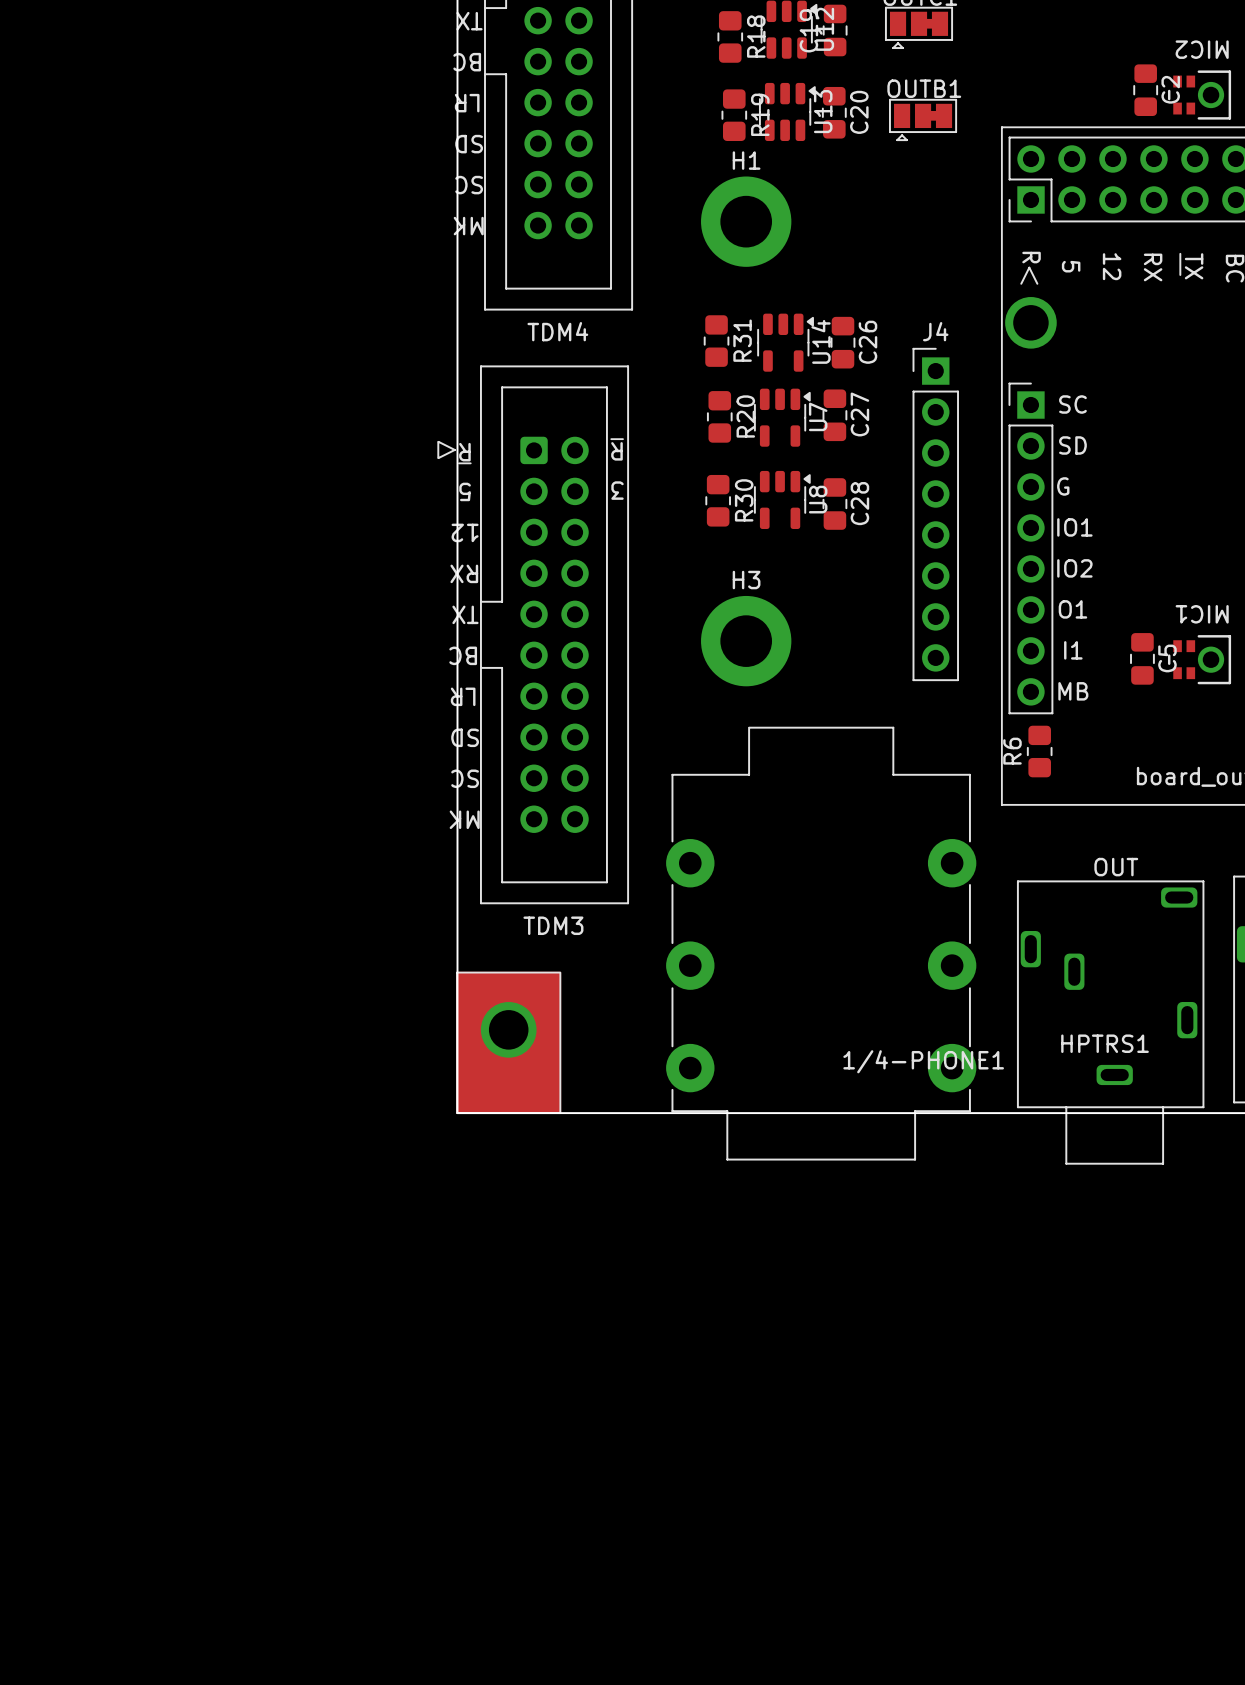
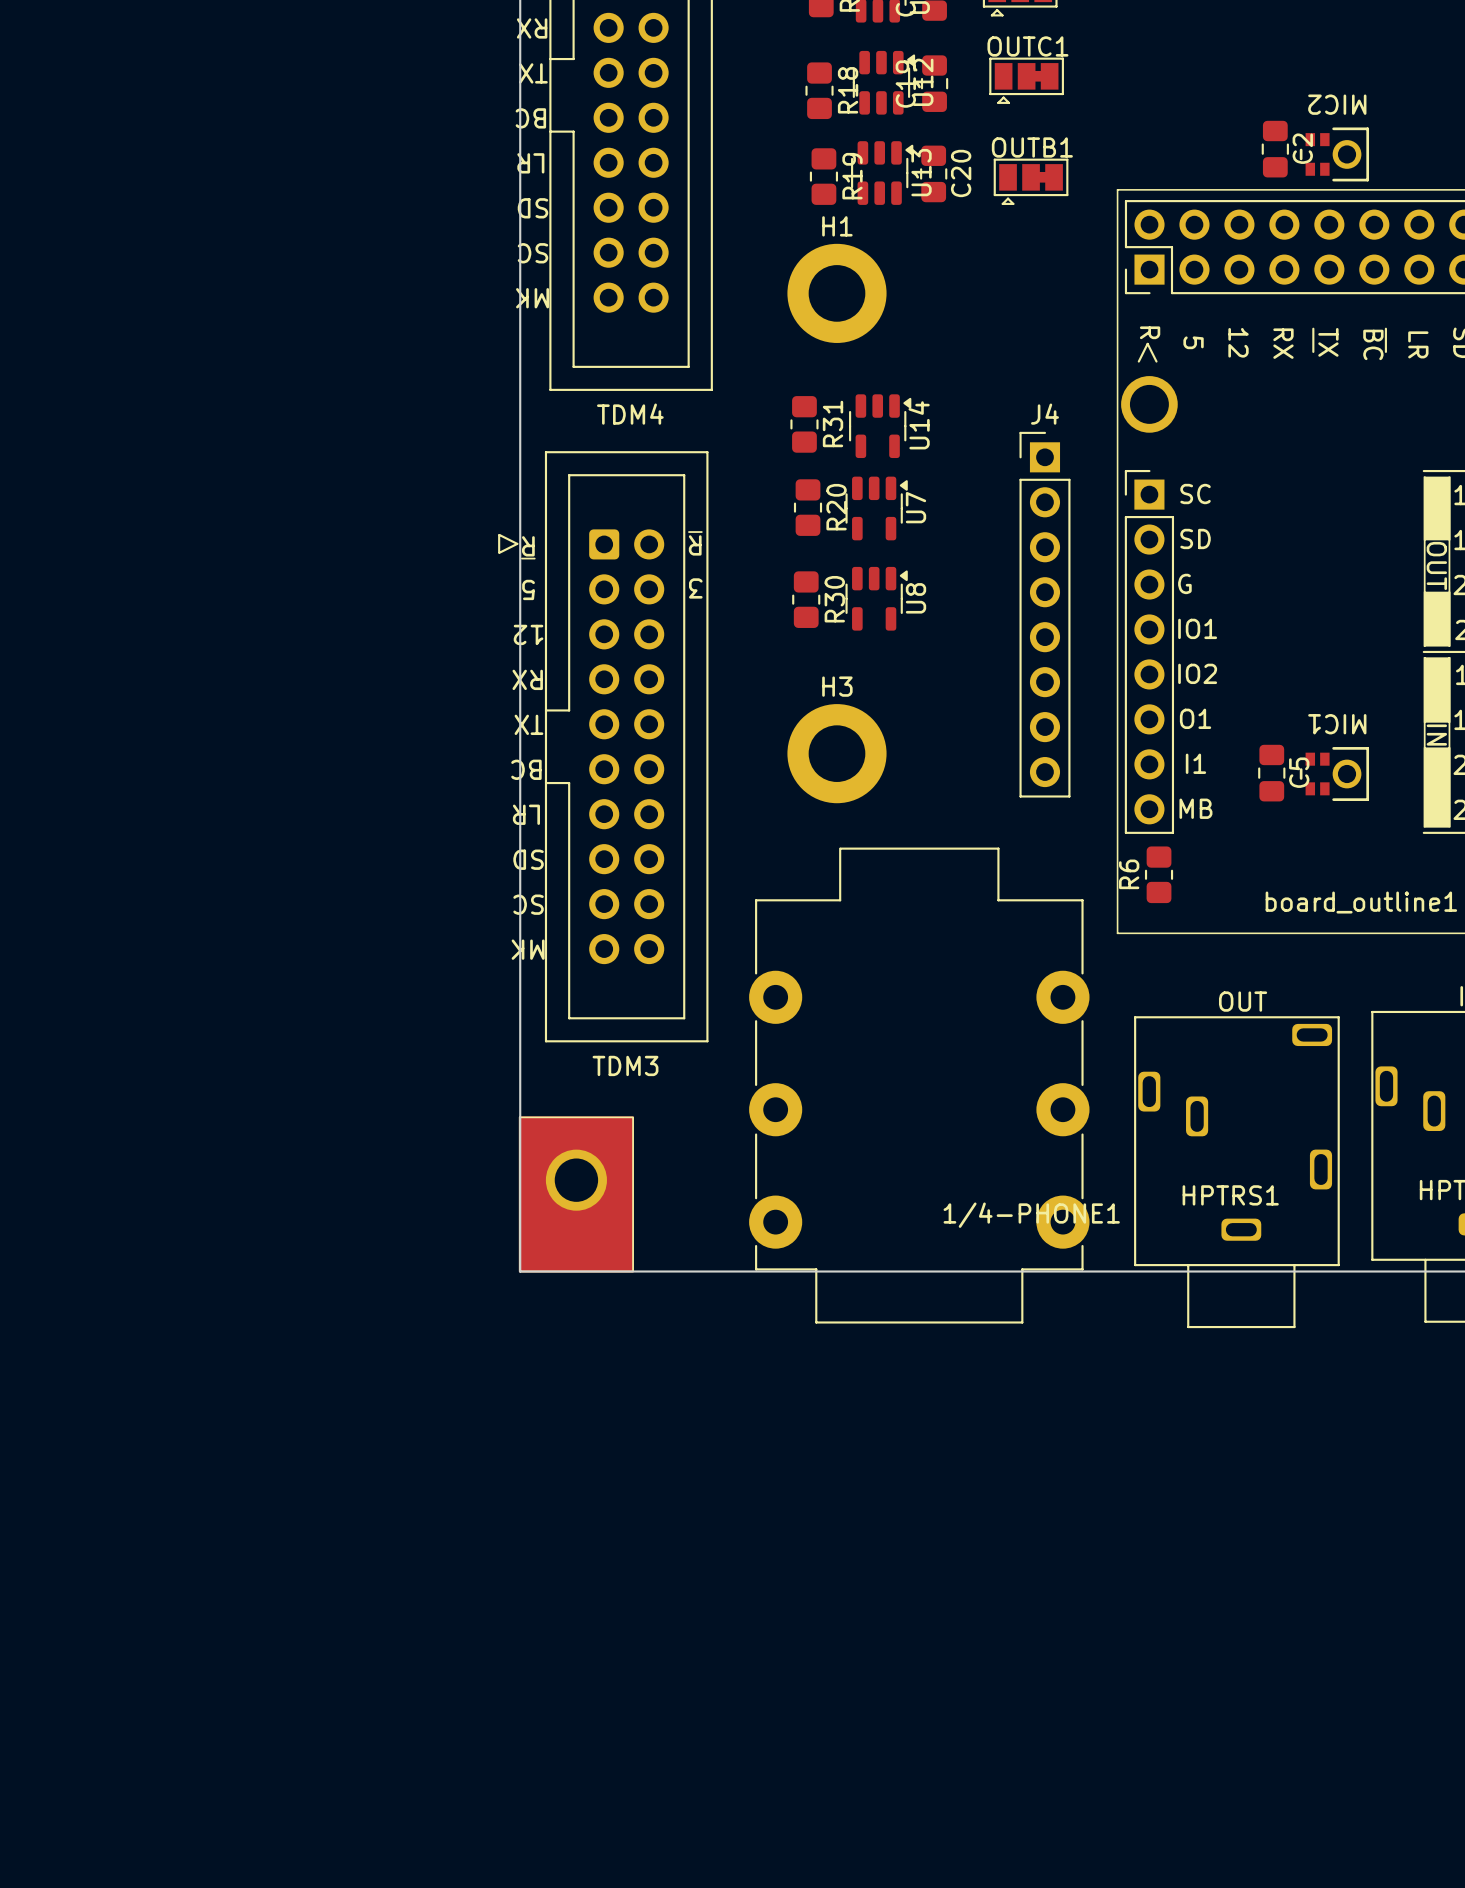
C26: (842, 342) -> none
C27: (834, 415) -> none
C28: (834, 504) -> none

